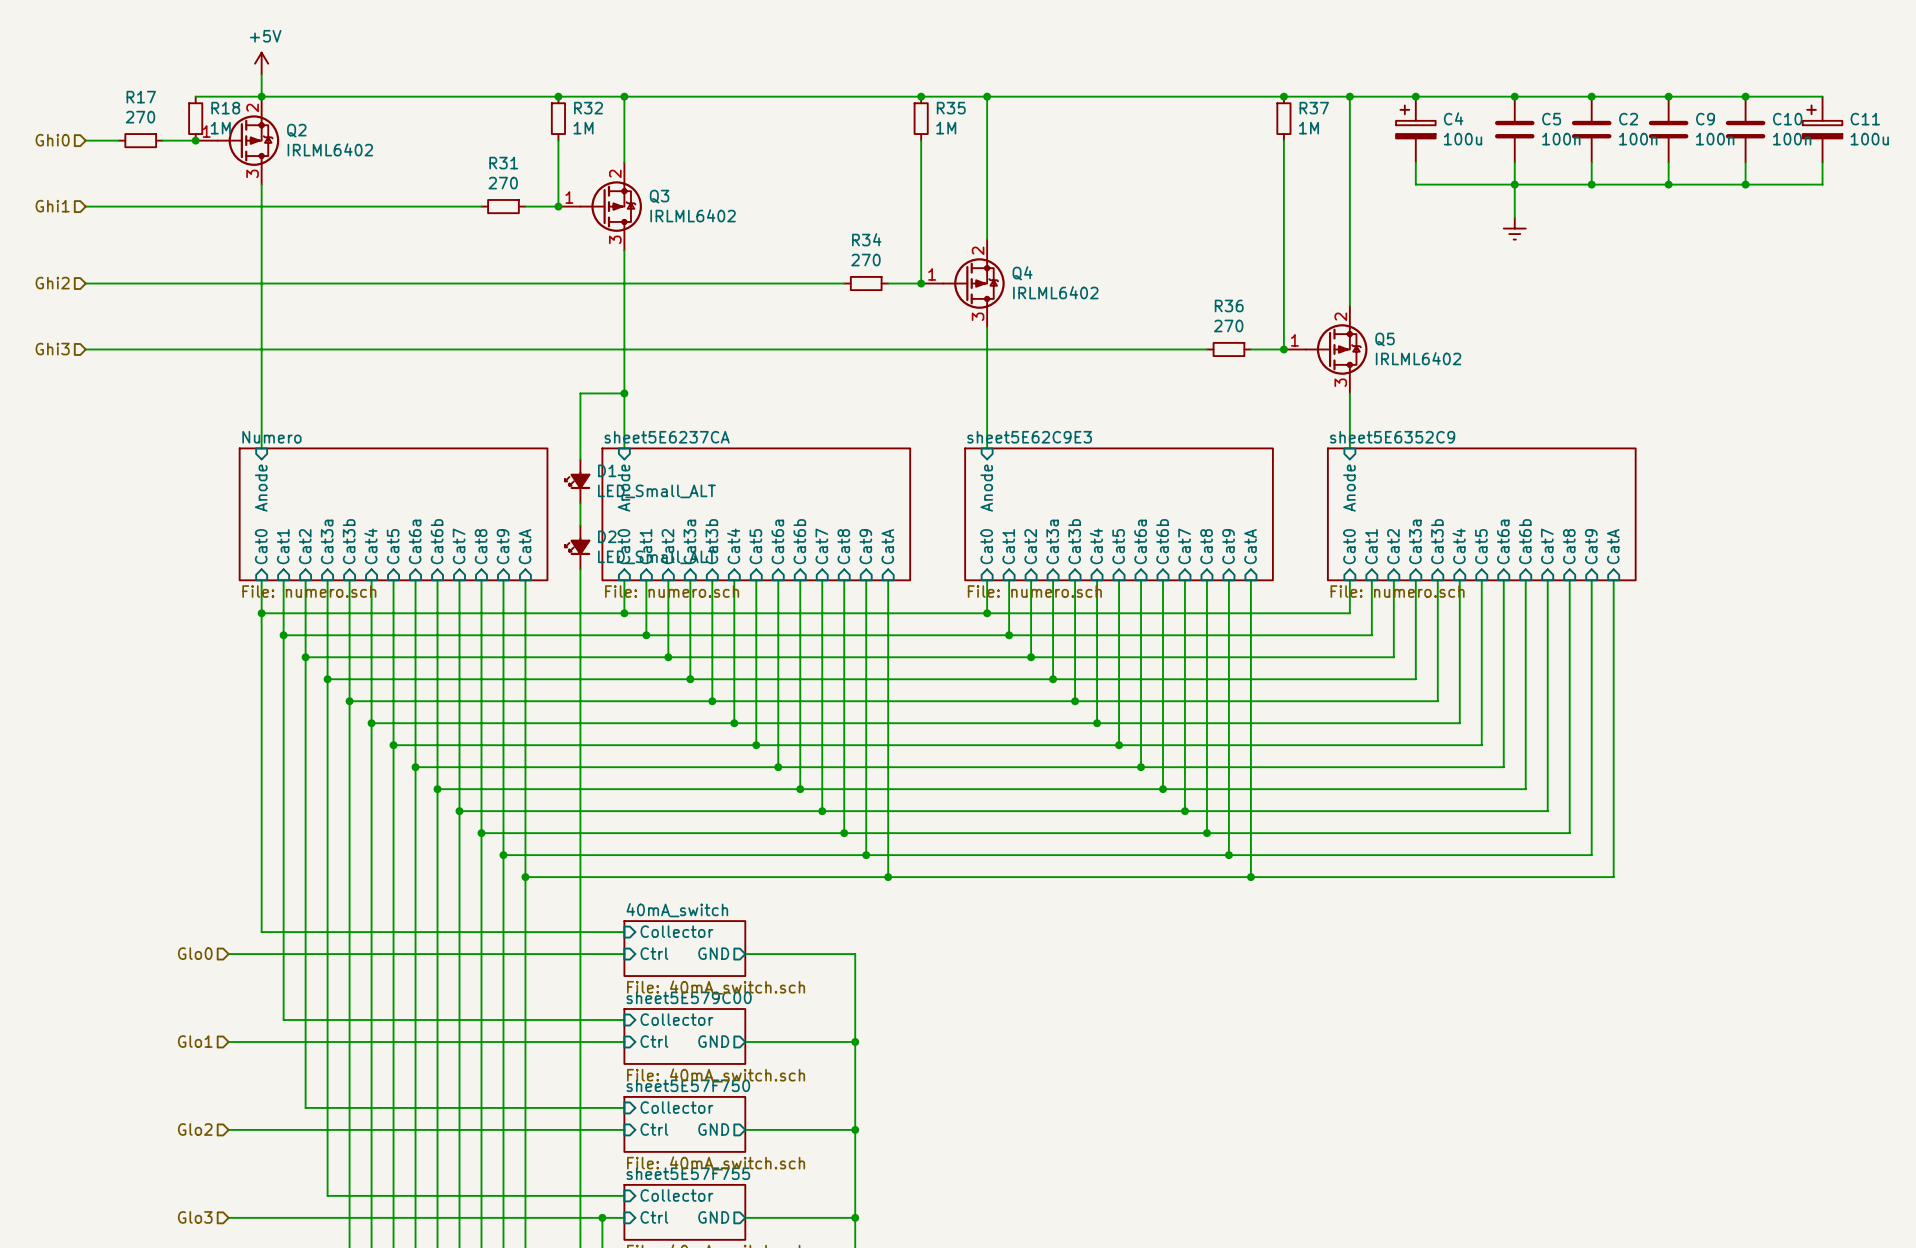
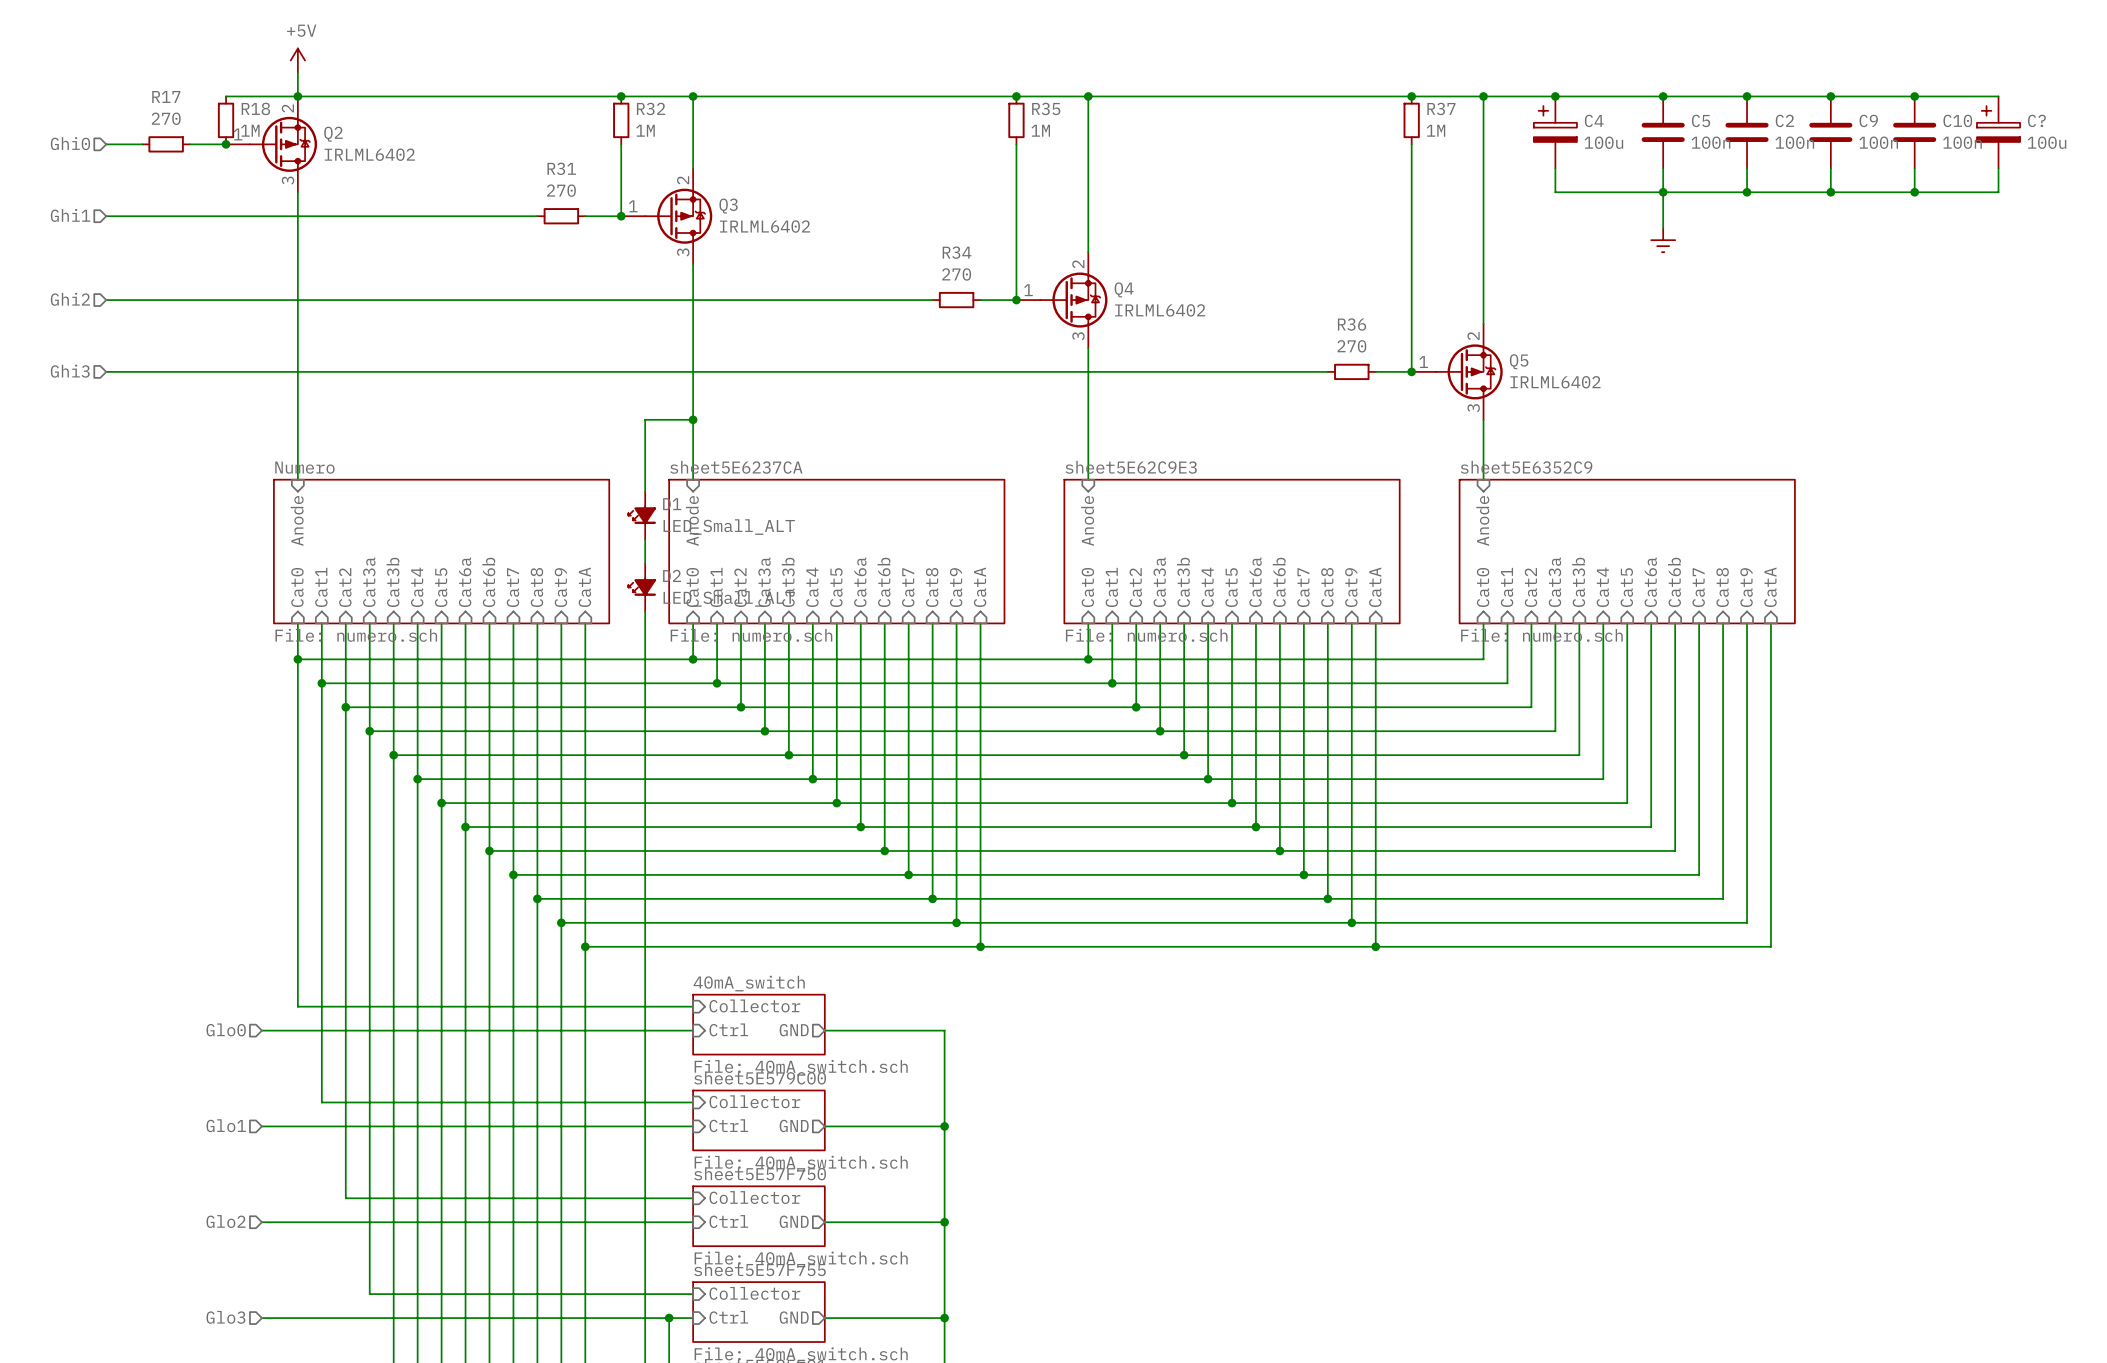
C11 name: C11 (1865, 119) -> C? (2036, 120)

